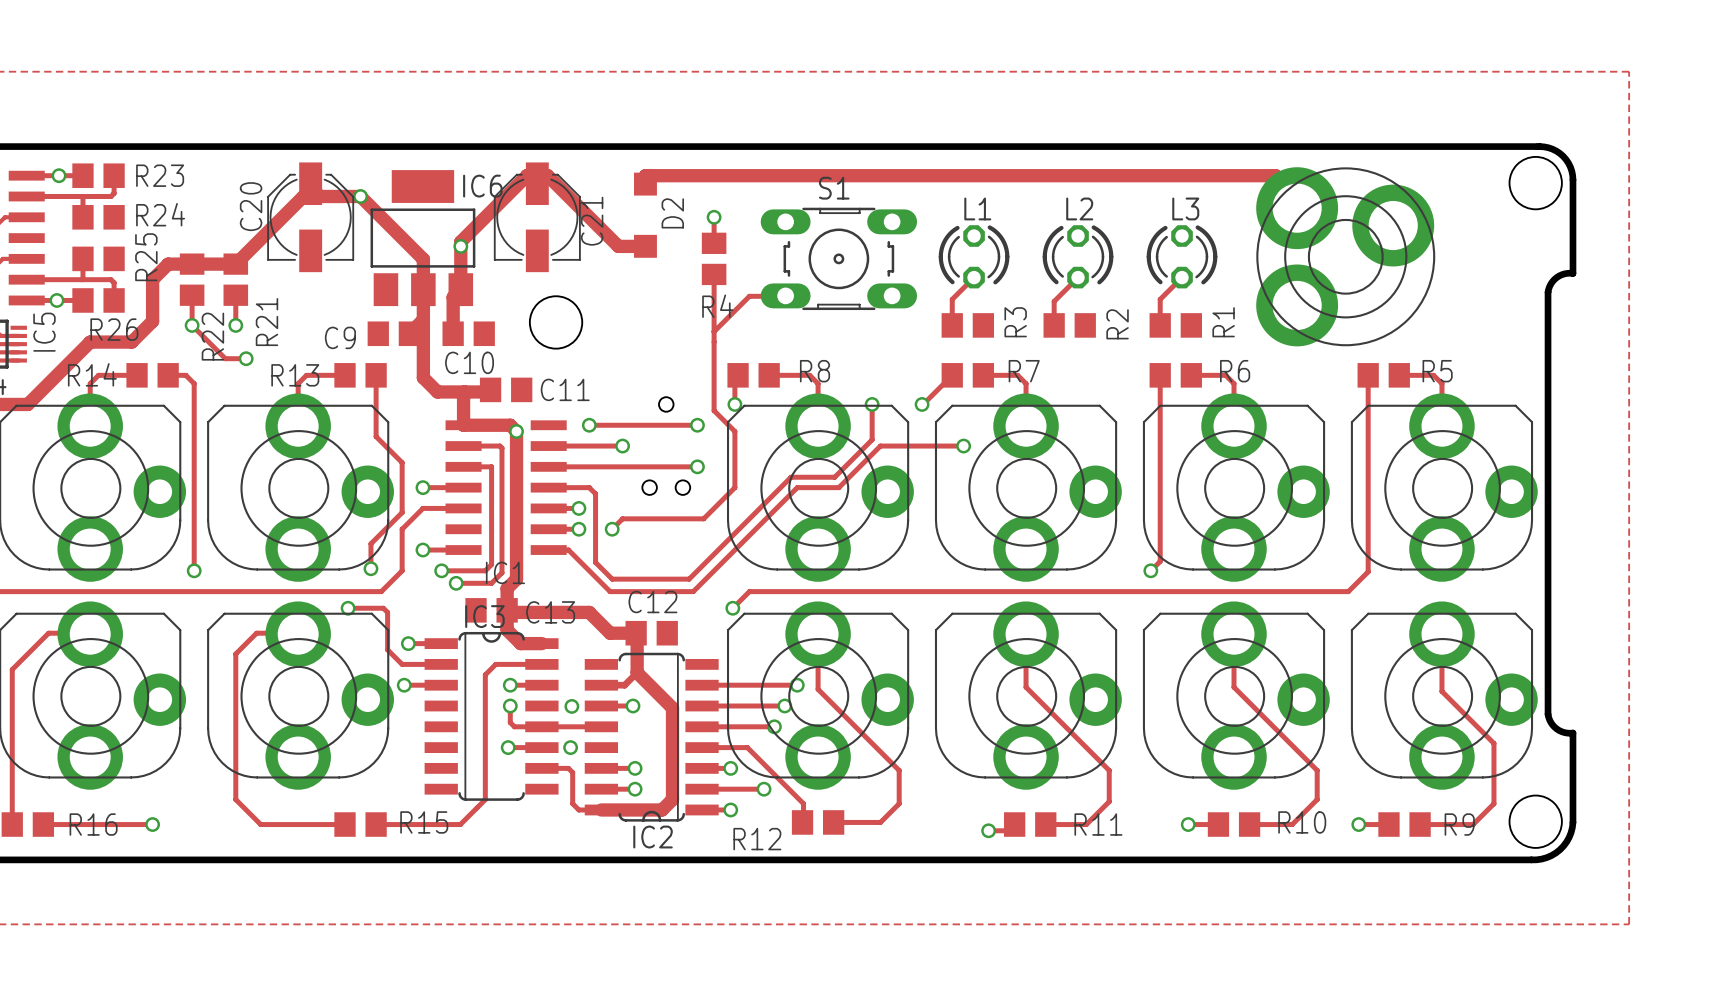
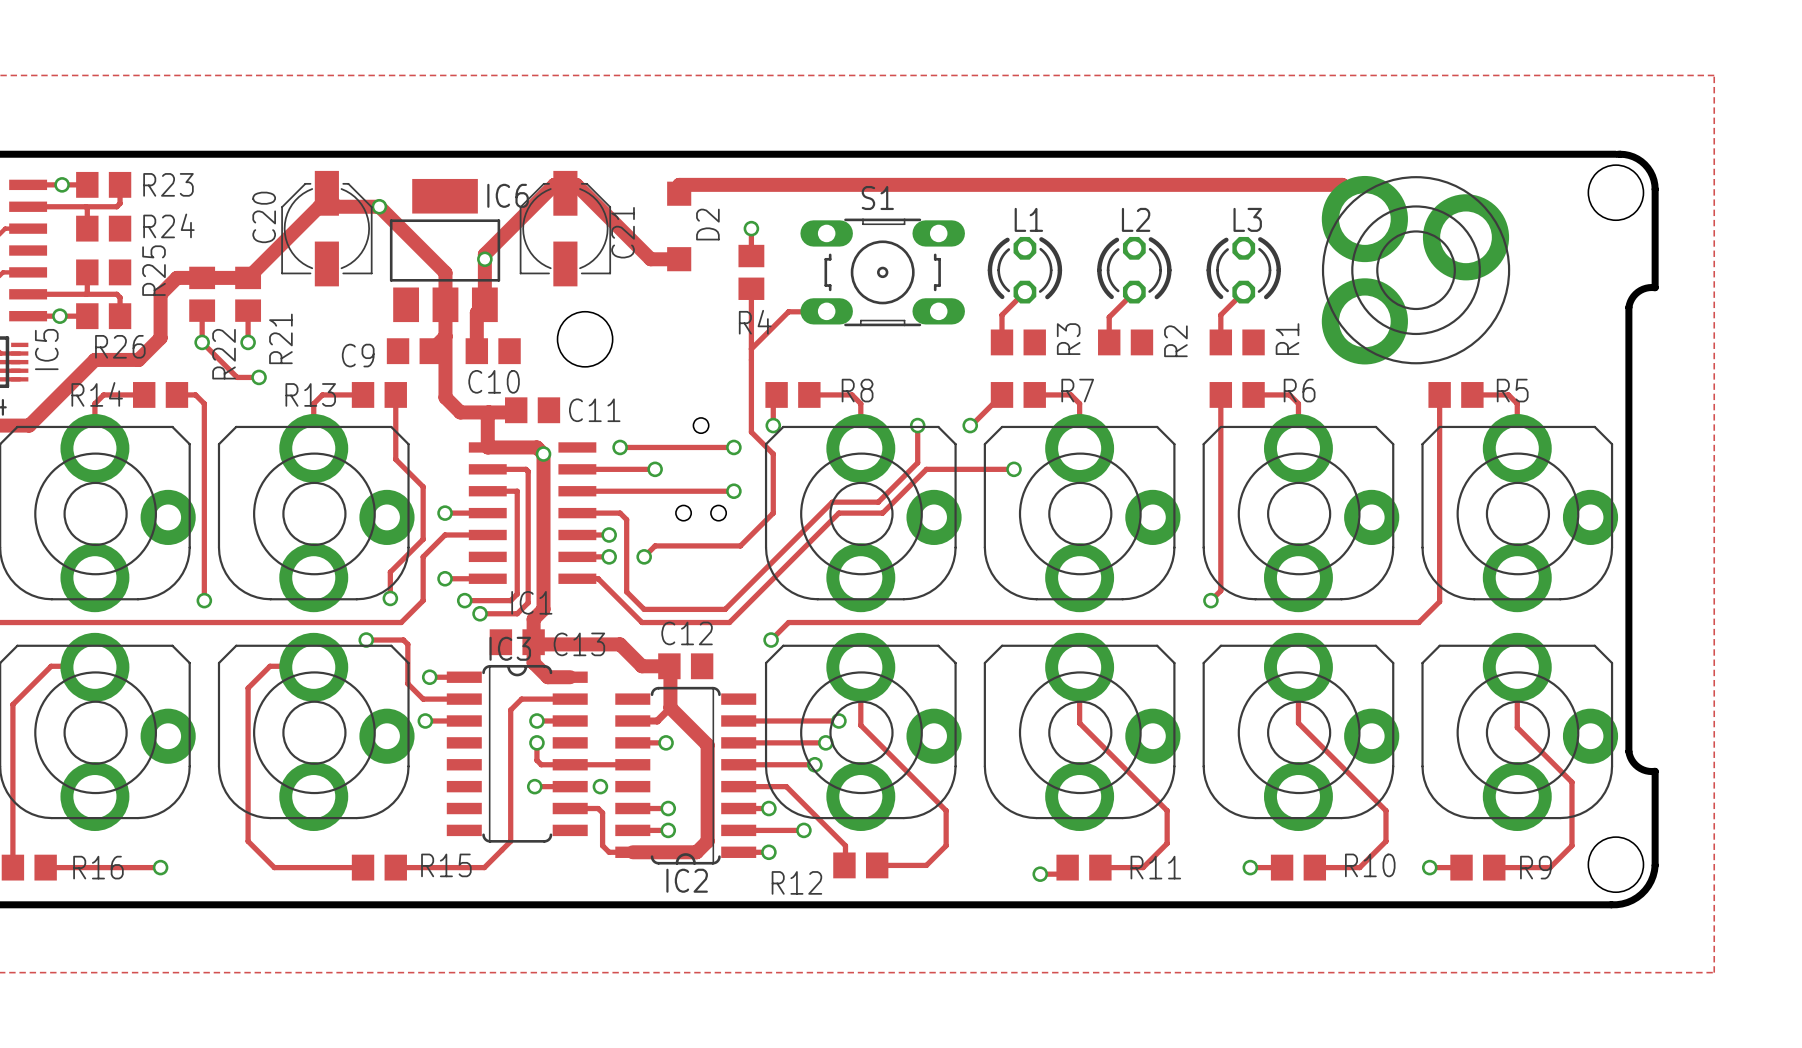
via: (571, 706) -> none

